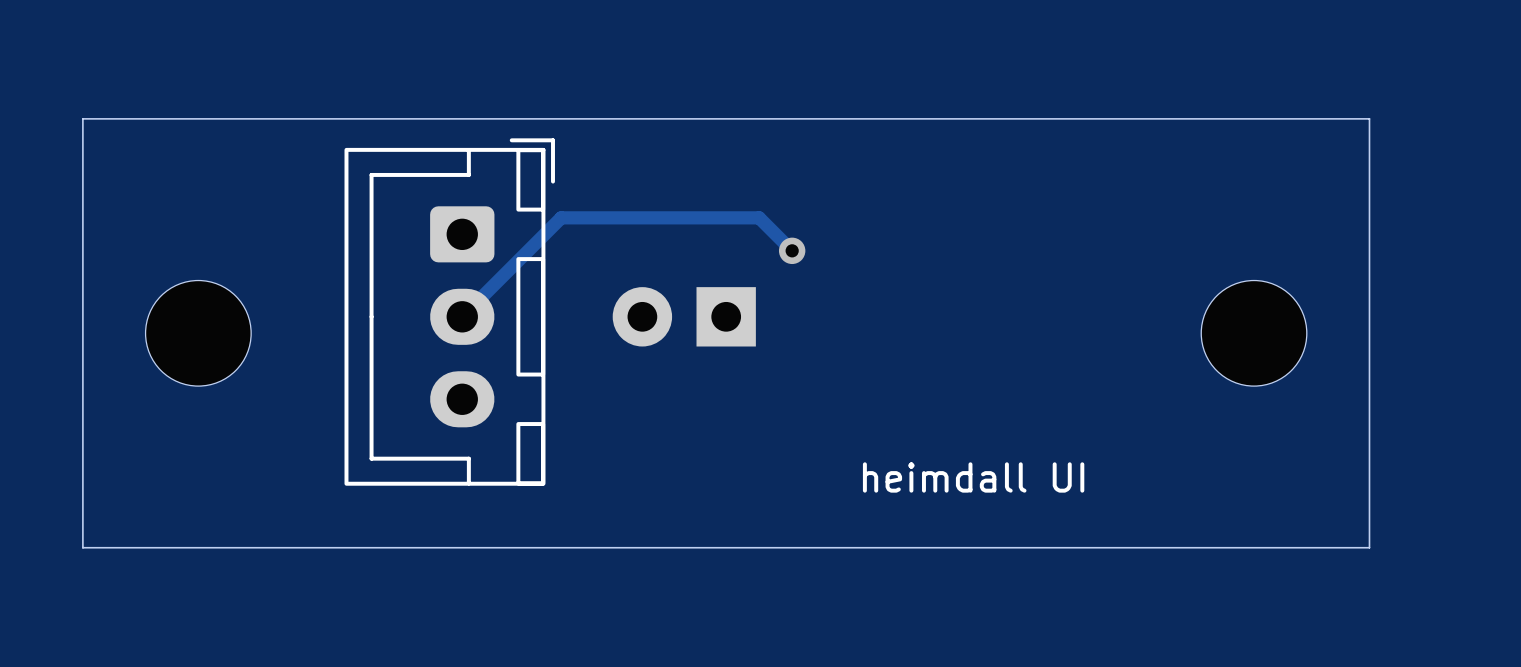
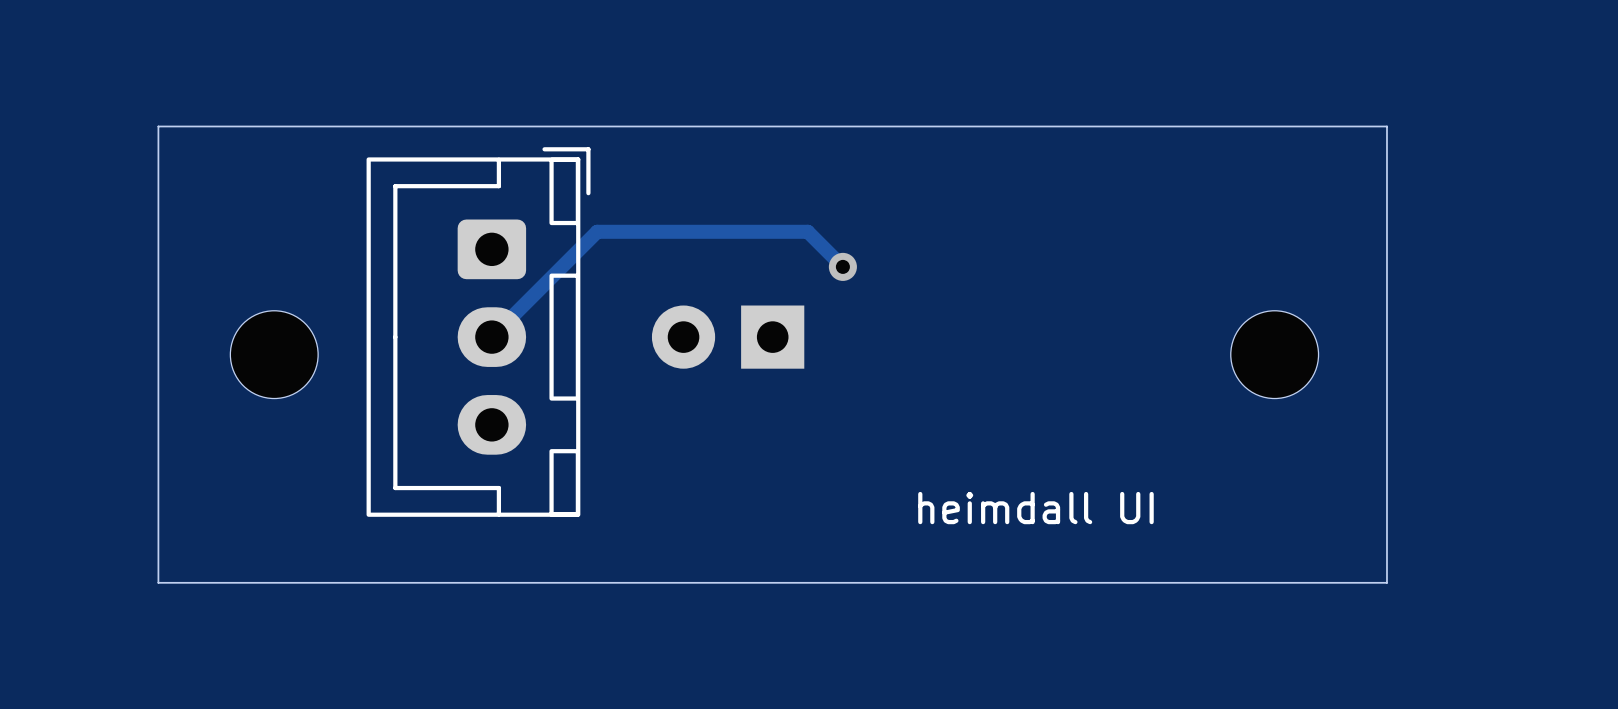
board edge: (148, 118) (82, 118) (82, 547) (148, 547) -> (158, 126) (158, 582)
board edge: (1303, 118) (1369, 118) (1369, 547) (1303, 547) -> (1386, 126) (1386, 582)
part: (198, 333) -> none
part: none -> (274, 354)
part: none -> (1274, 354)
part: (1254, 333) -> none

